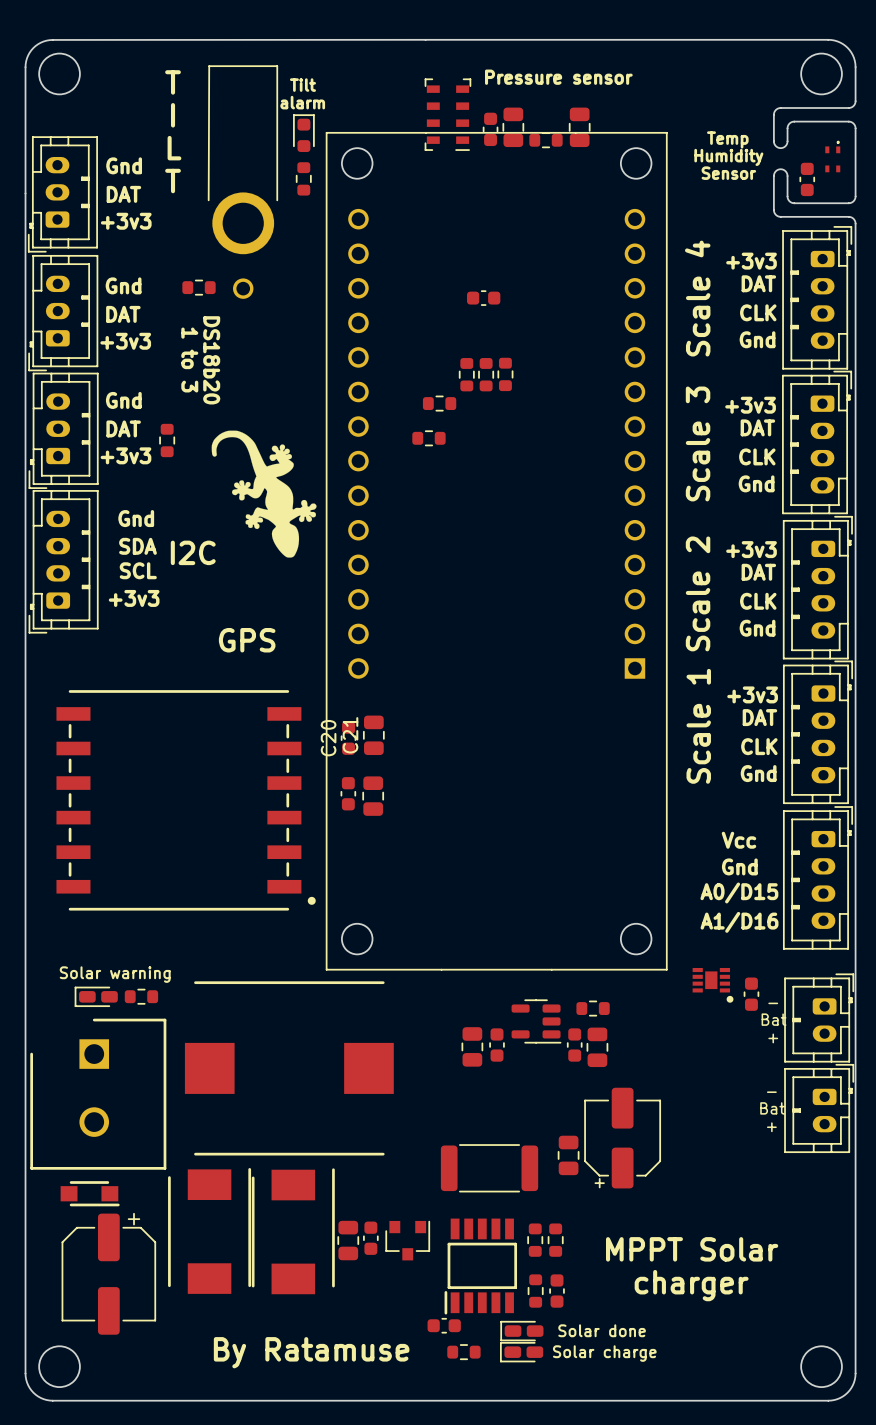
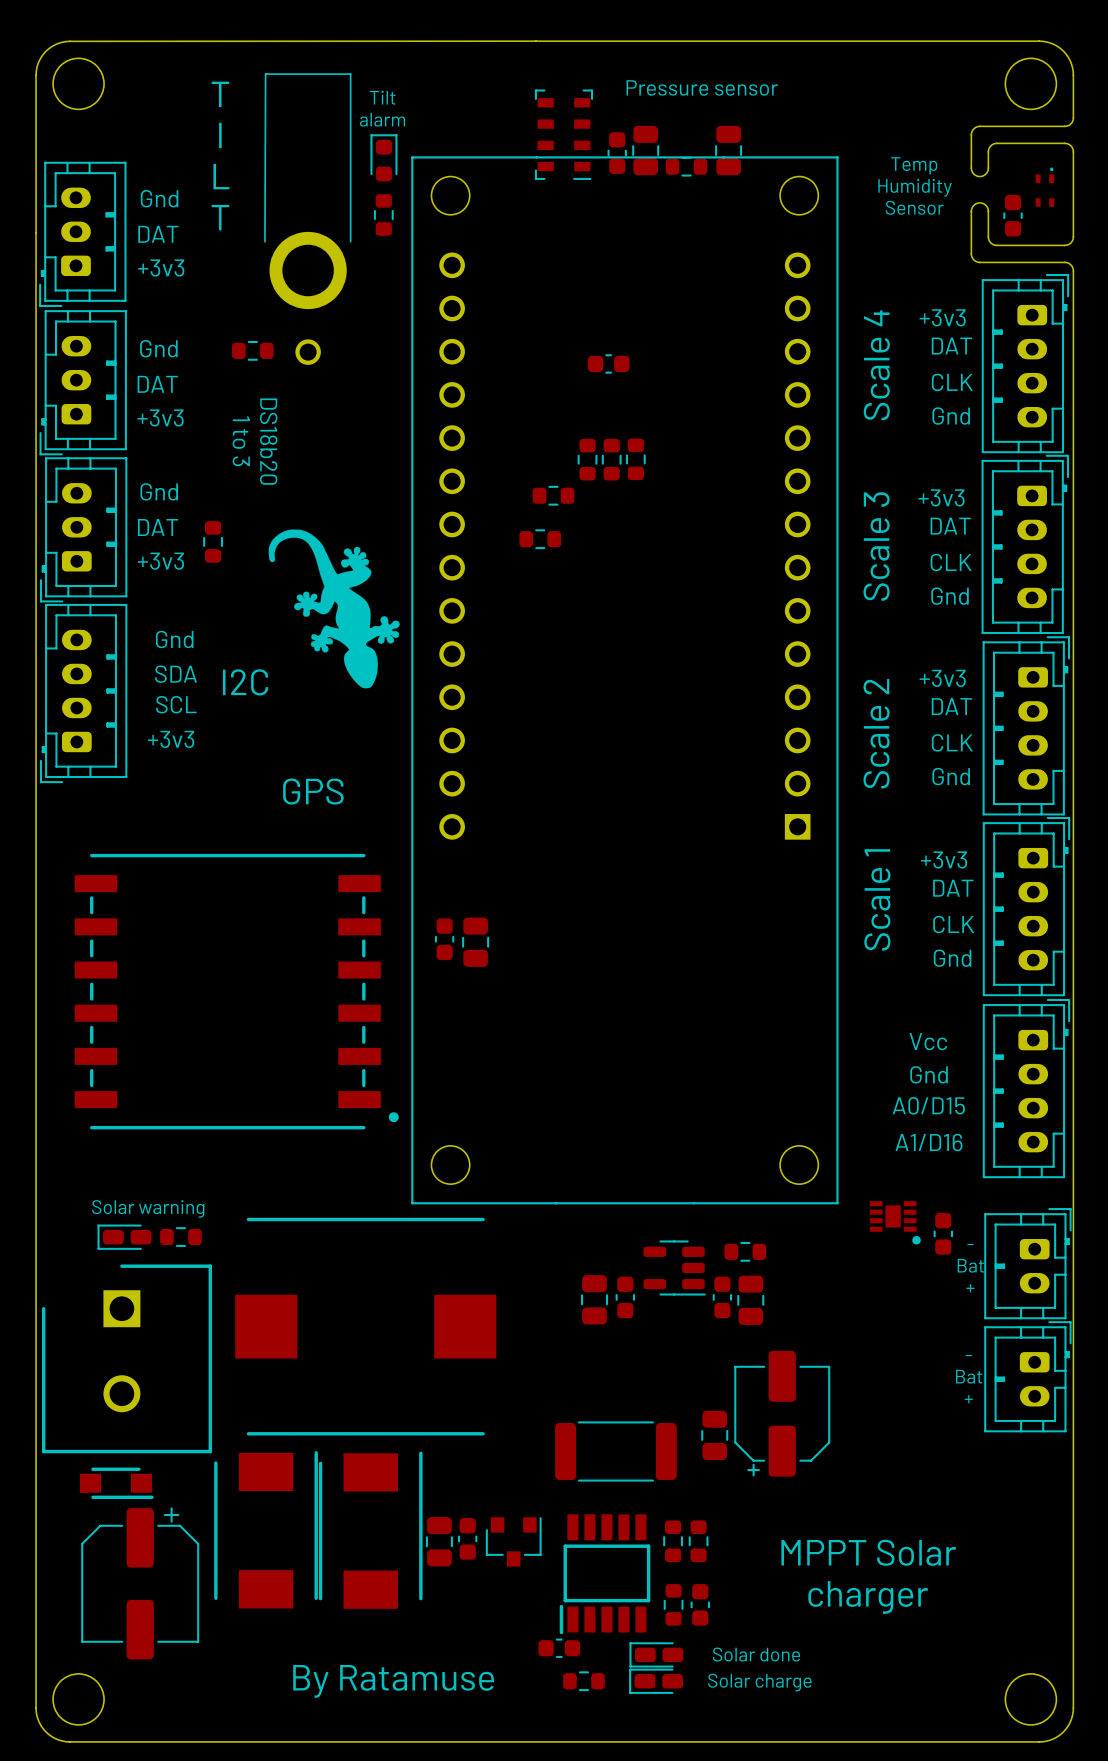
C21: (373, 735) -> none
C20: (348, 738) -> none
part position: (348, 793) -> (444, 939)
part position: (373, 796) -> (475, 942)

